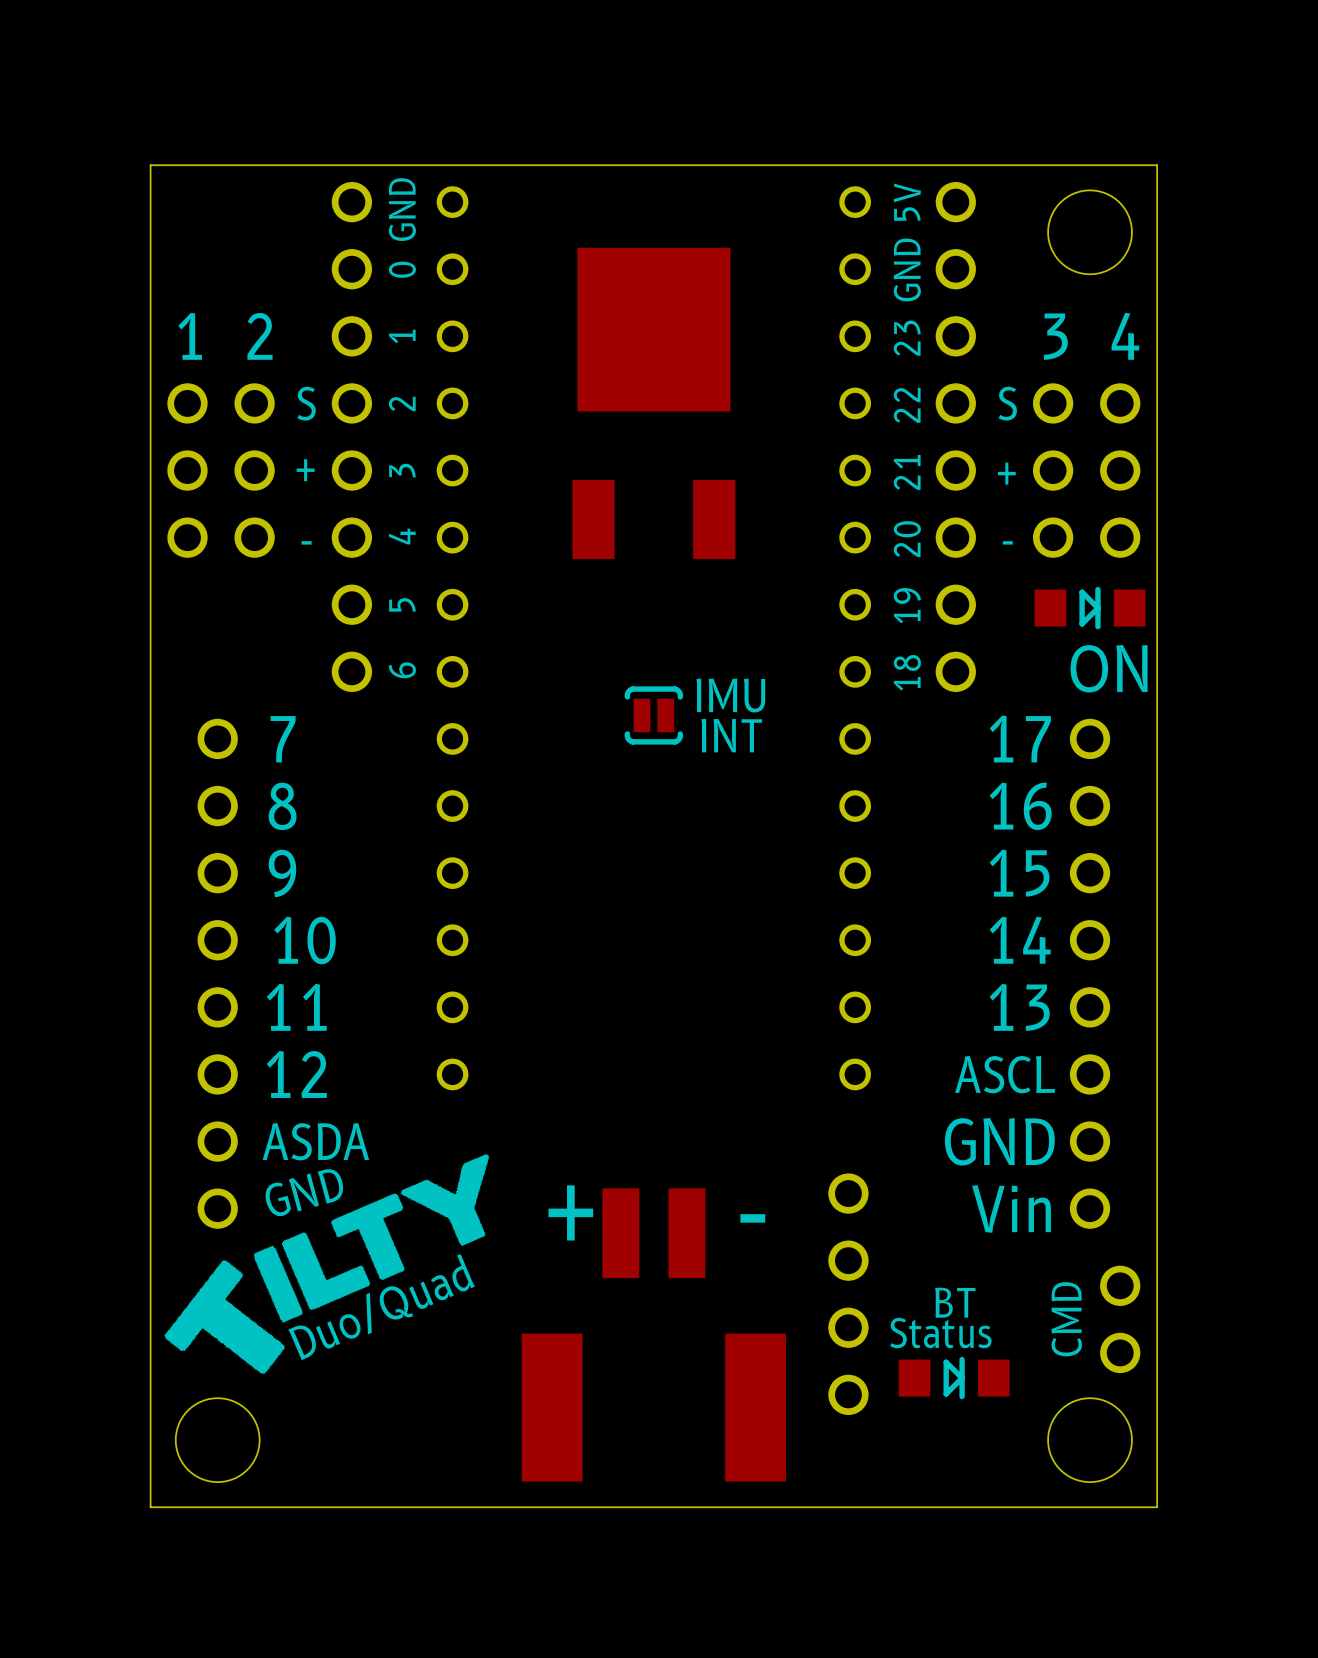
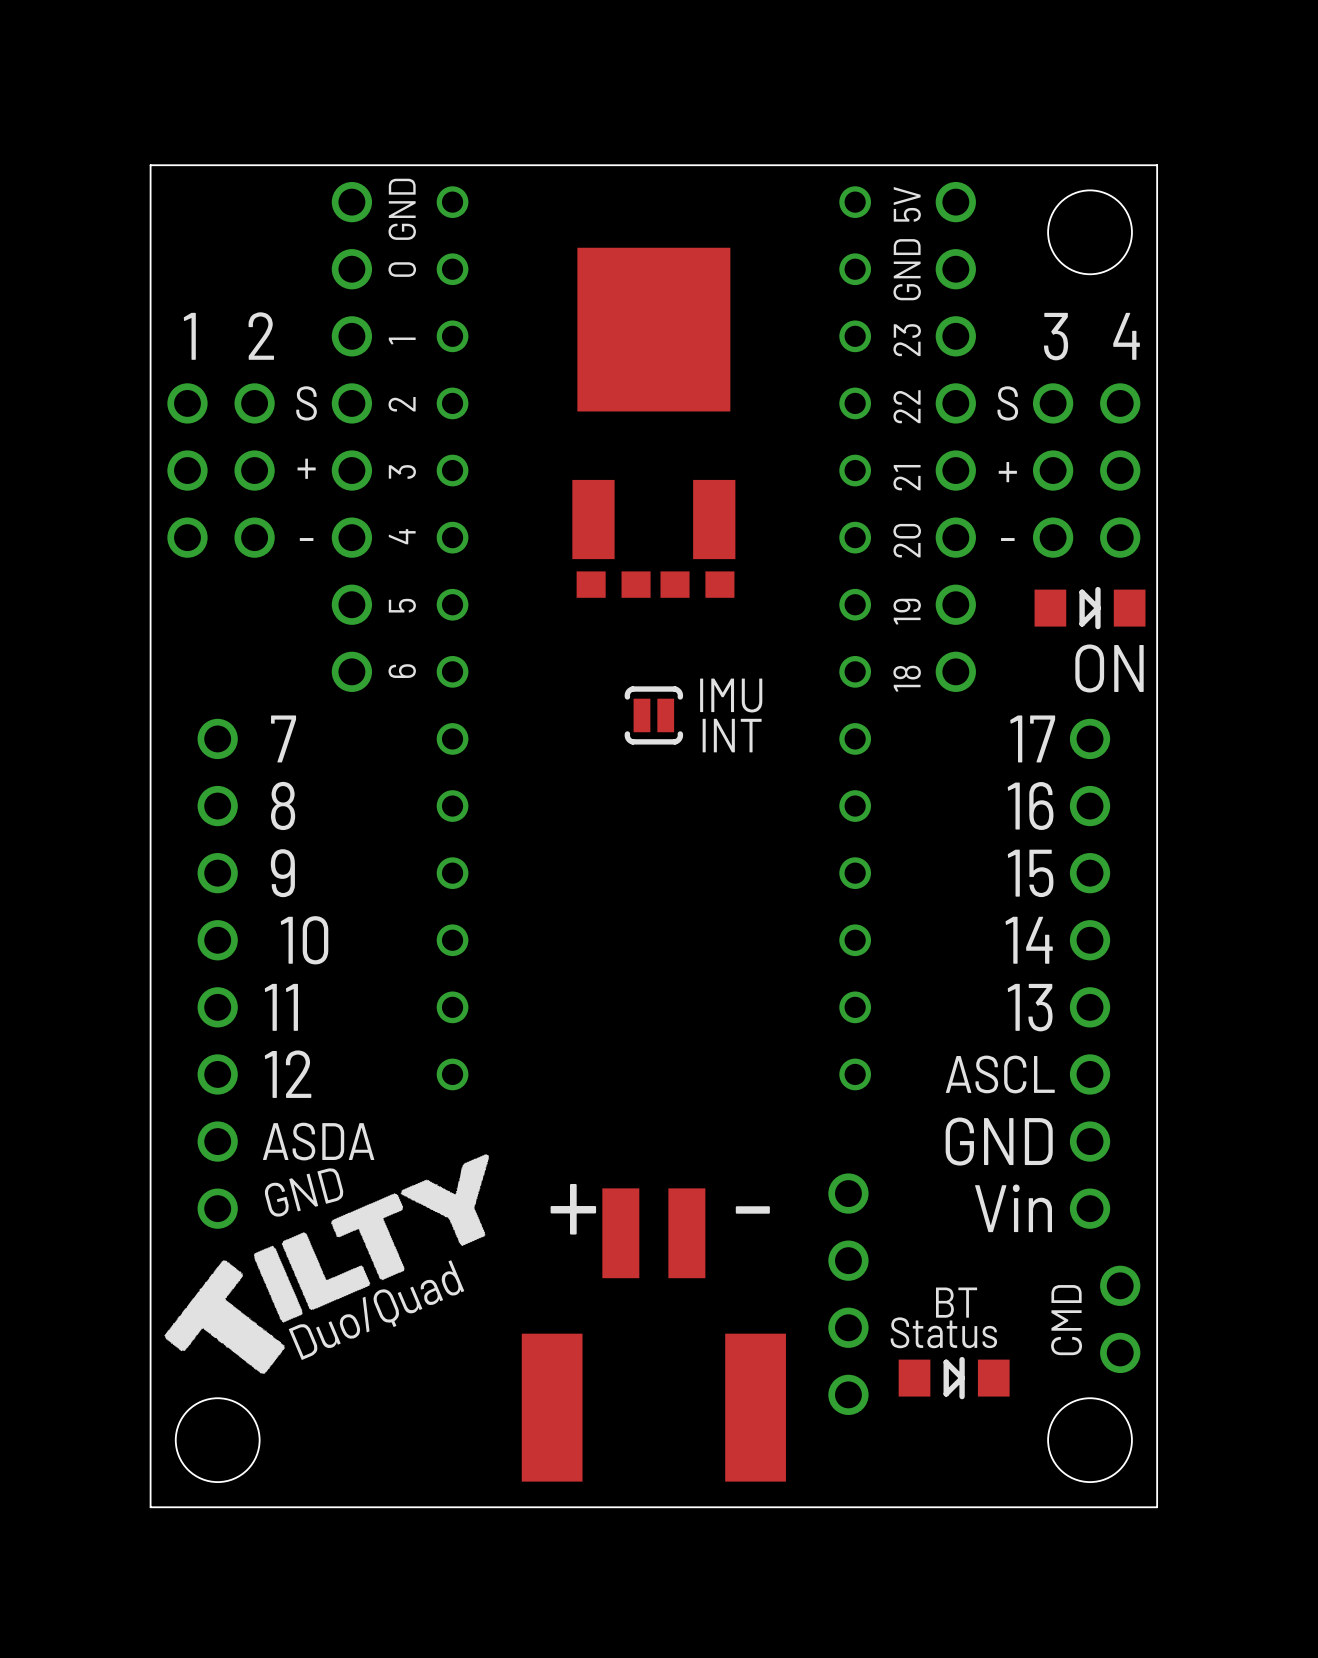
part: none -> (613, 584)
part: none -> (697, 584)

